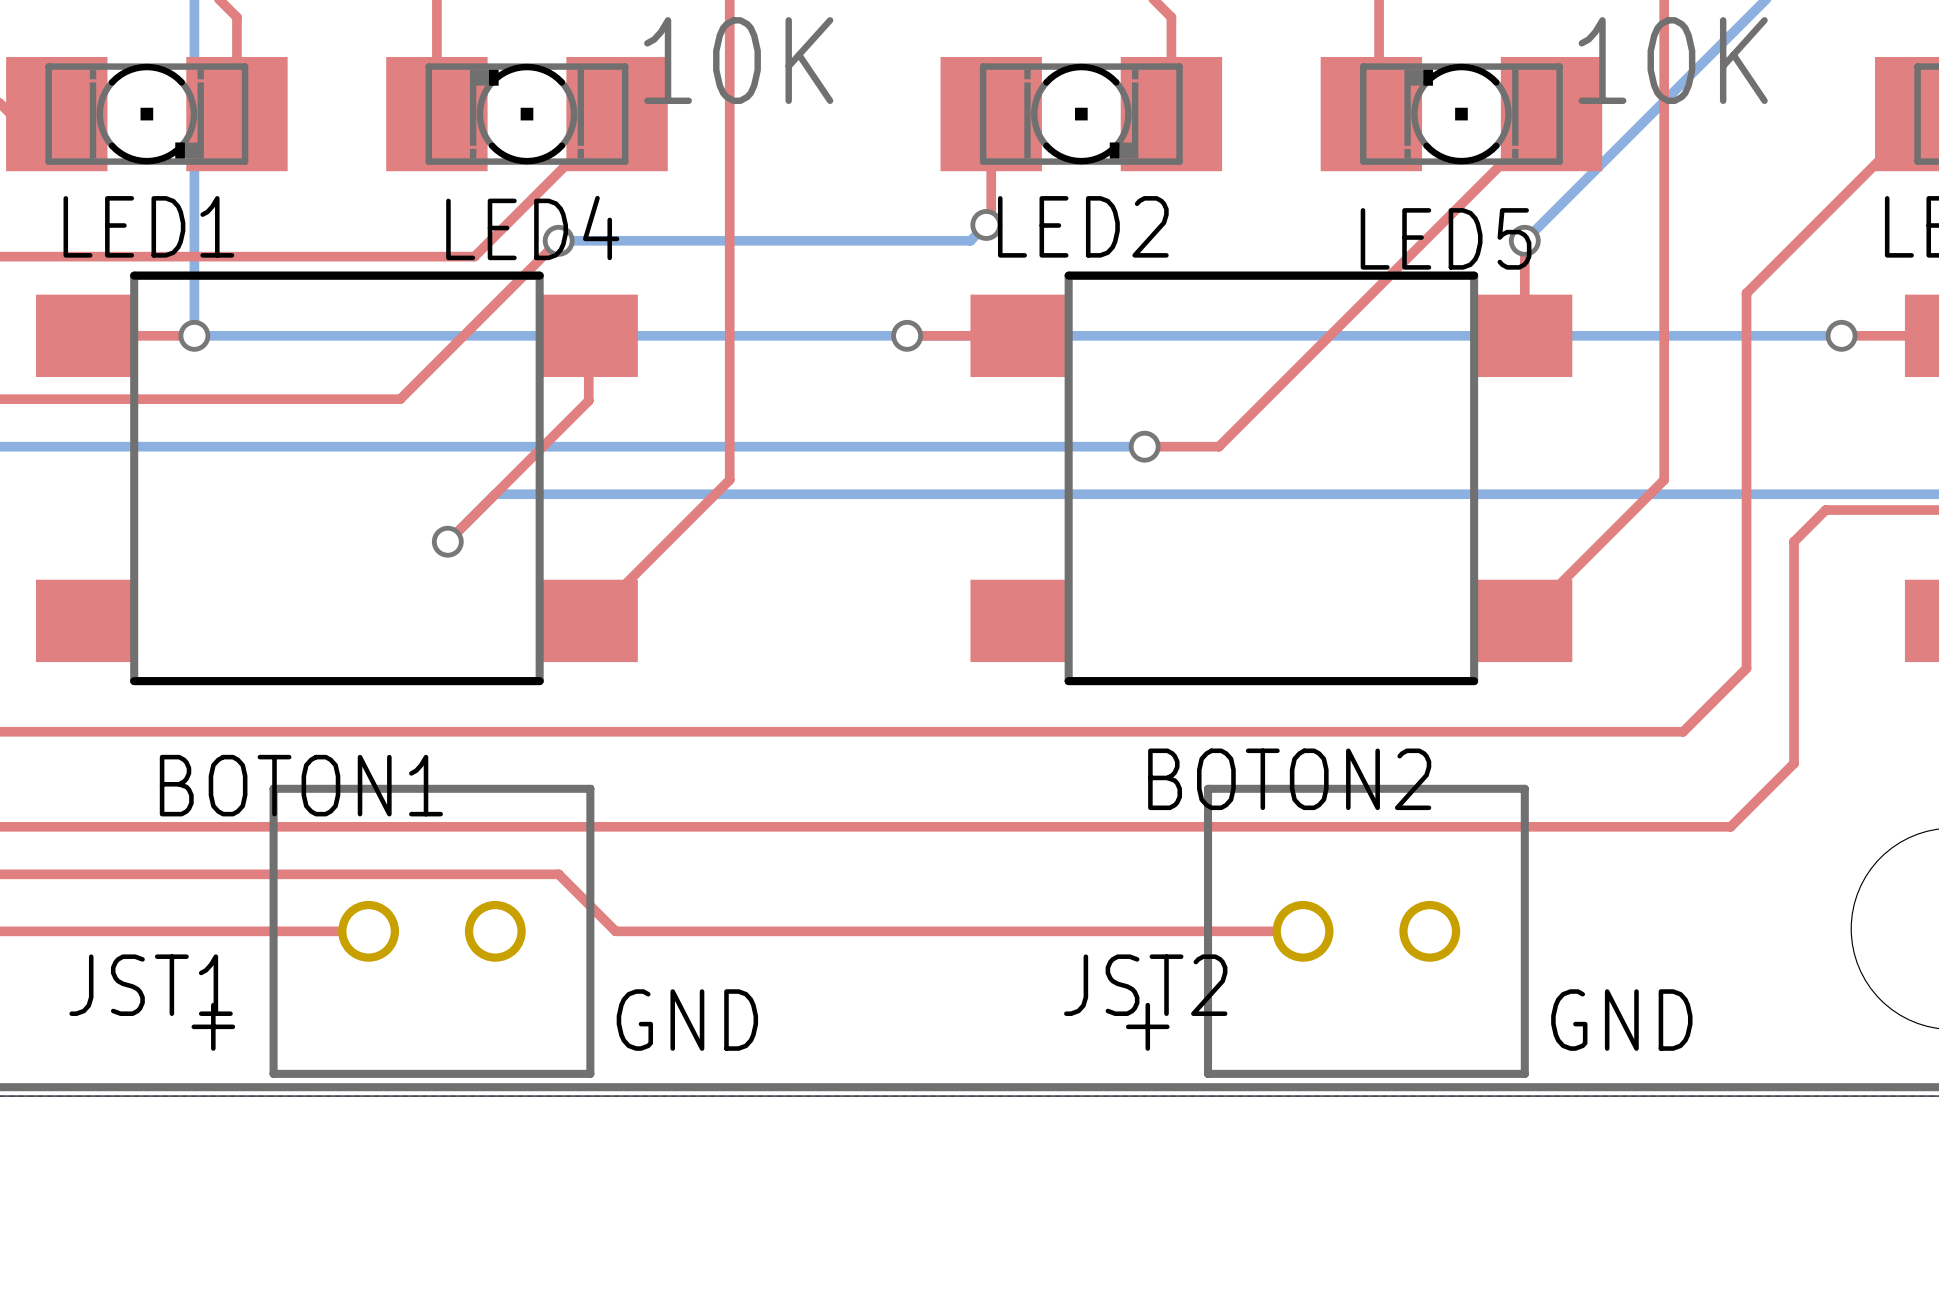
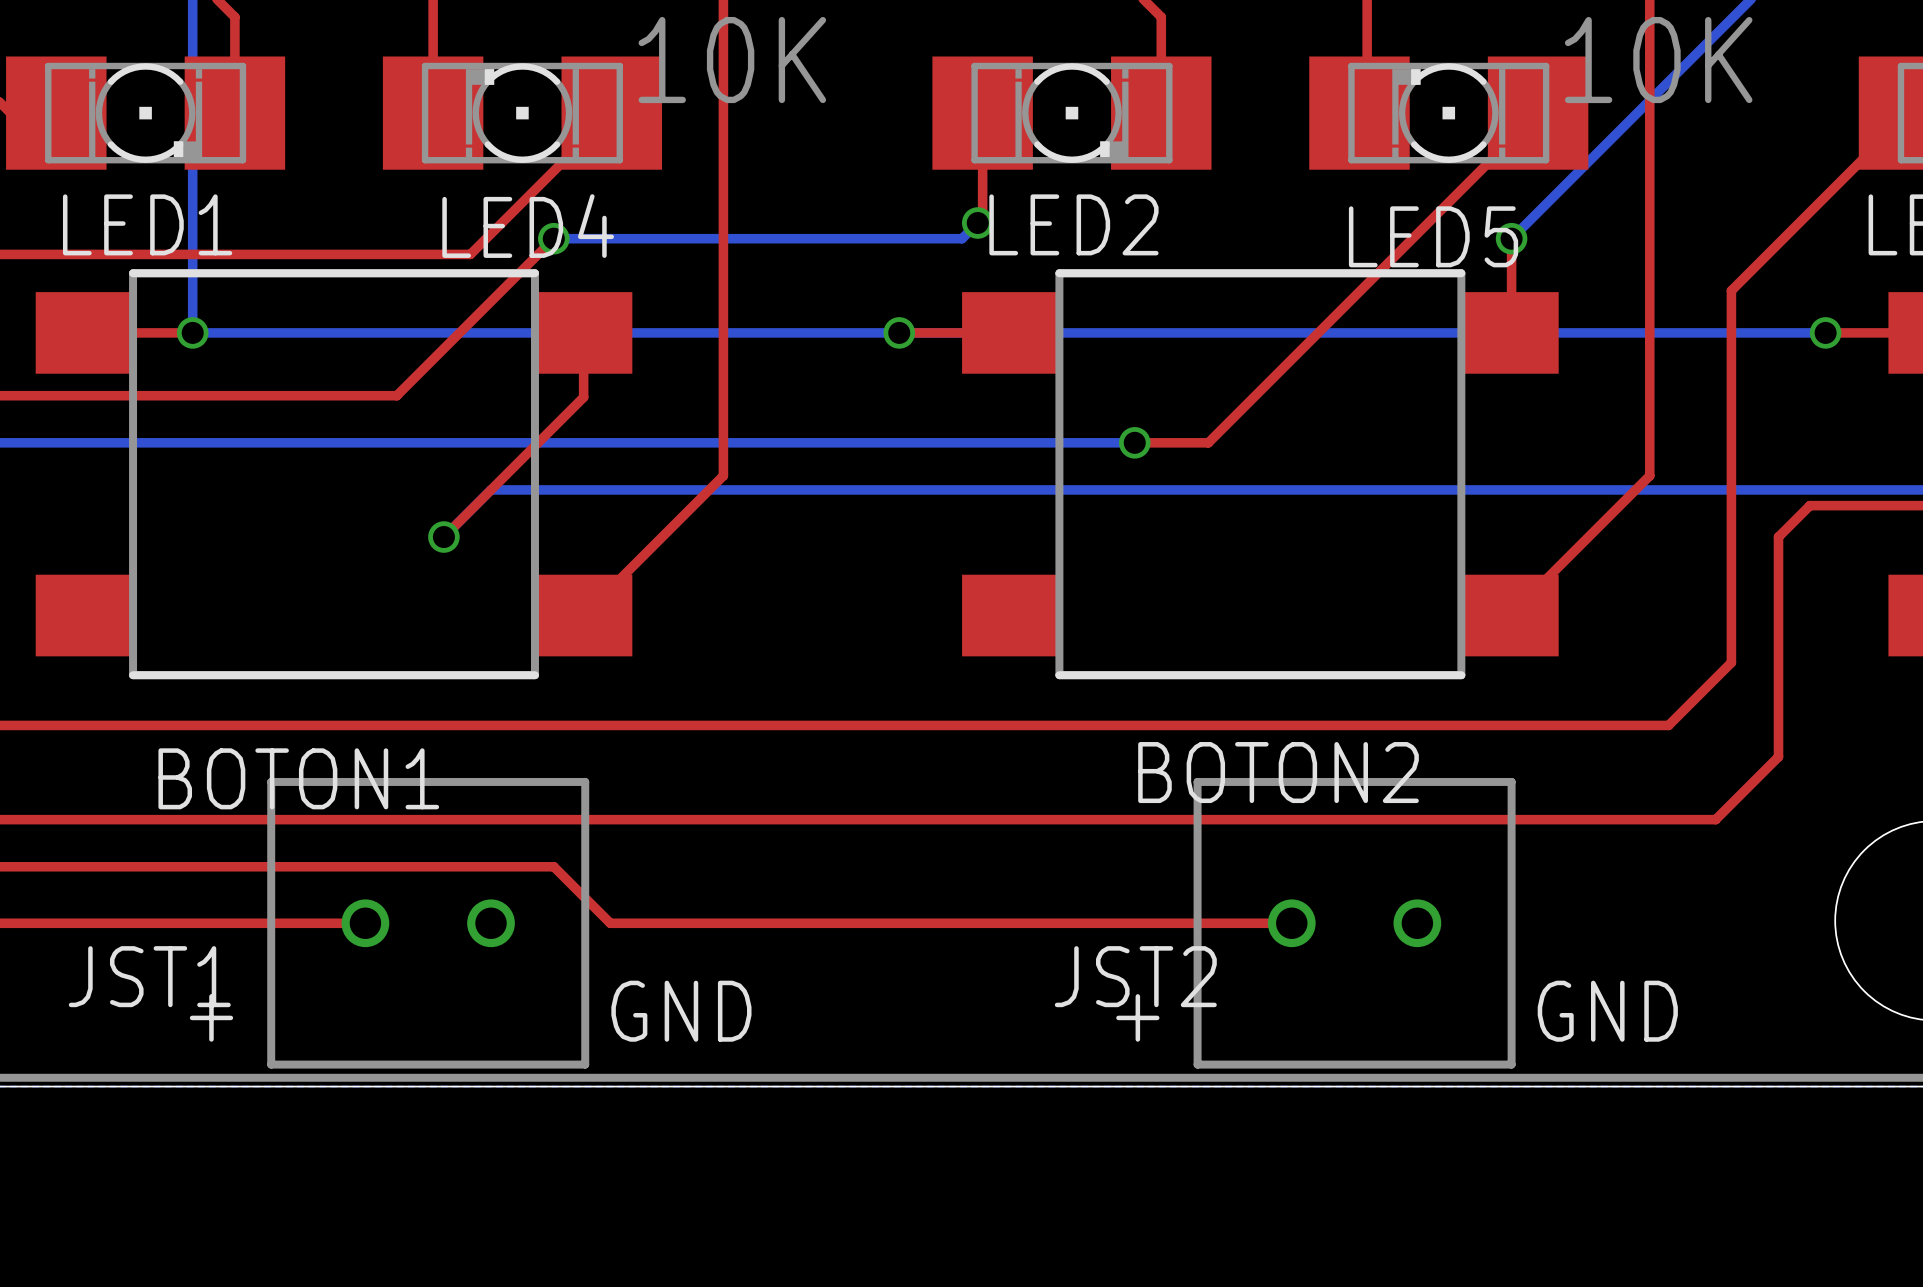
JST1 footprint: [269, 784, 595, 1078] -> [267, 777, 590, 1069]
JST2 footprint: [1204, 784, 1529, 1078] -> [1193, 777, 1516, 1069]

